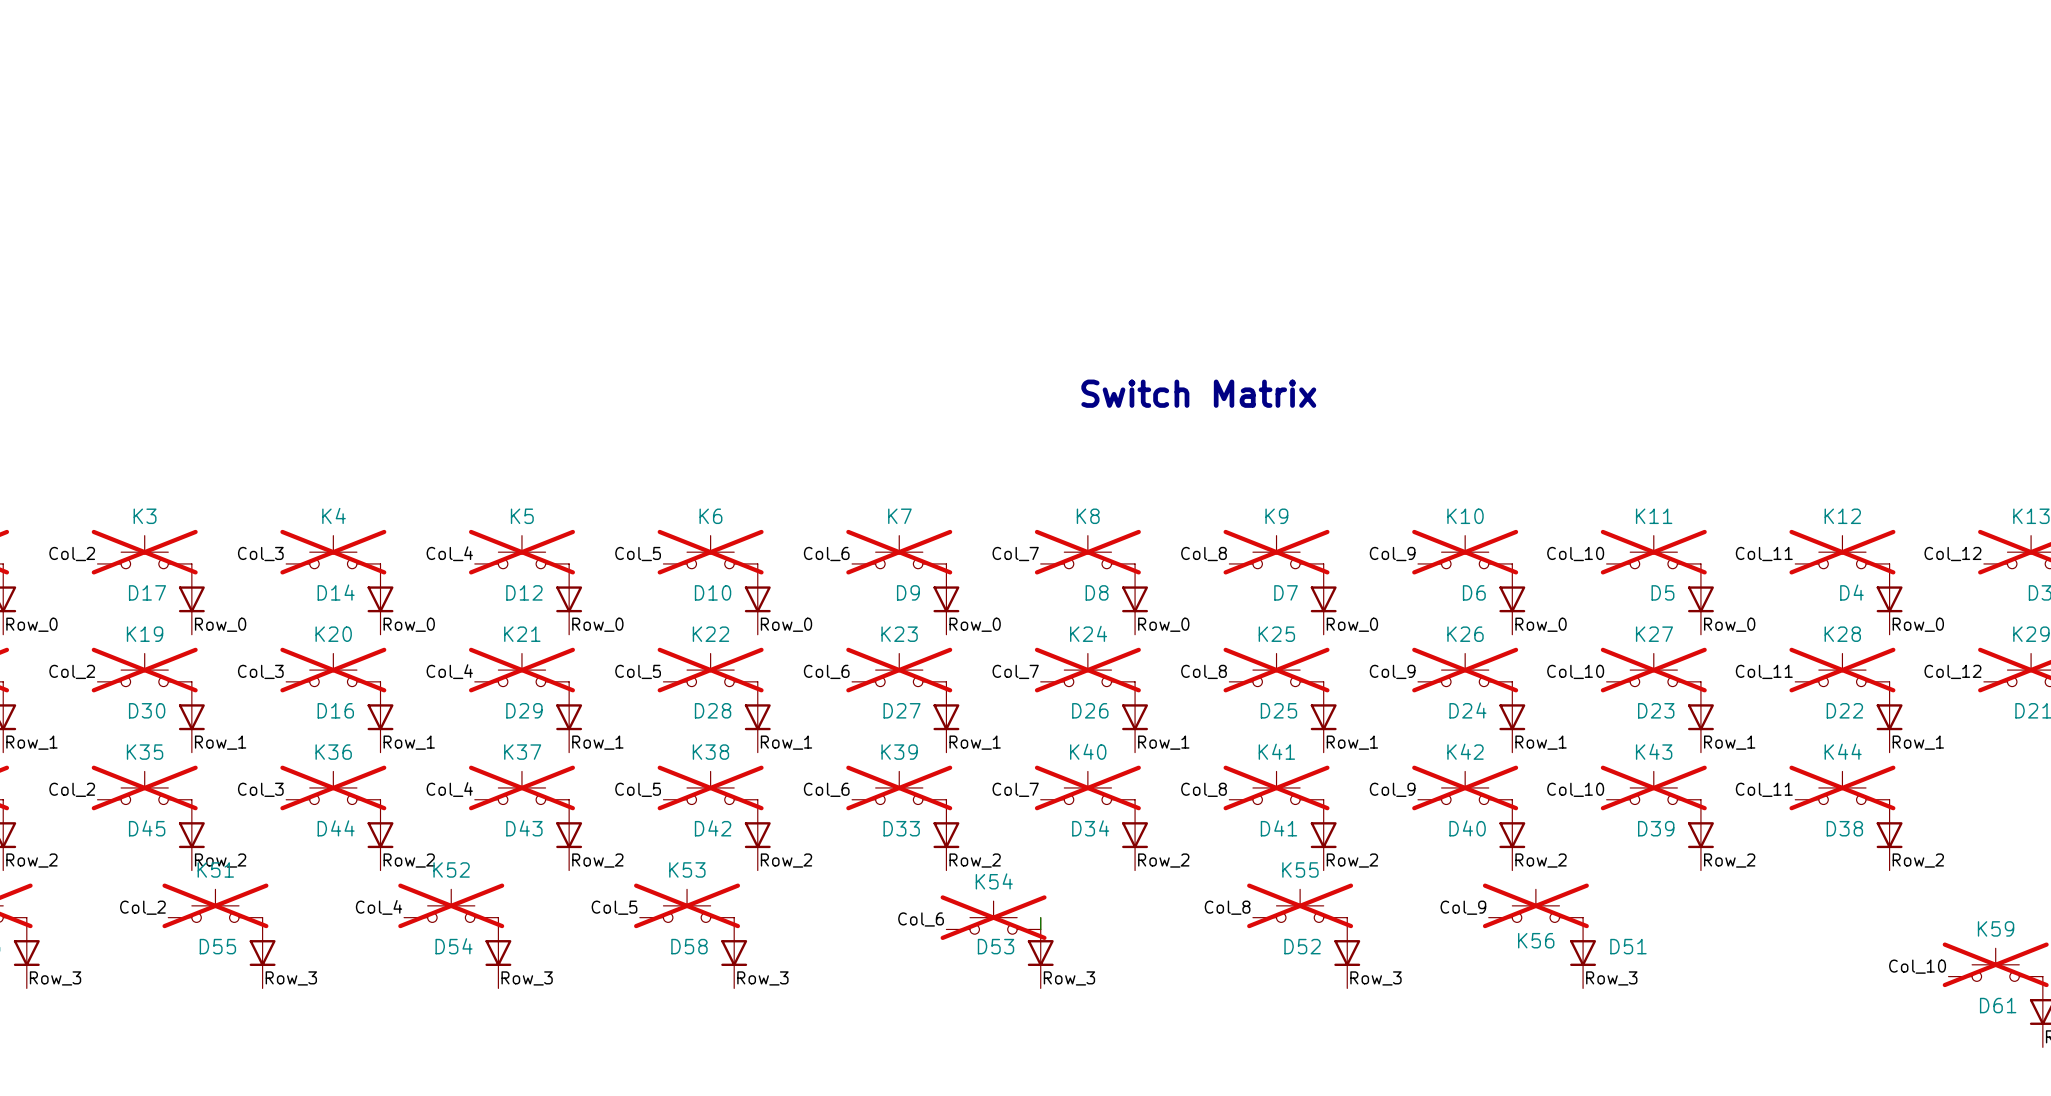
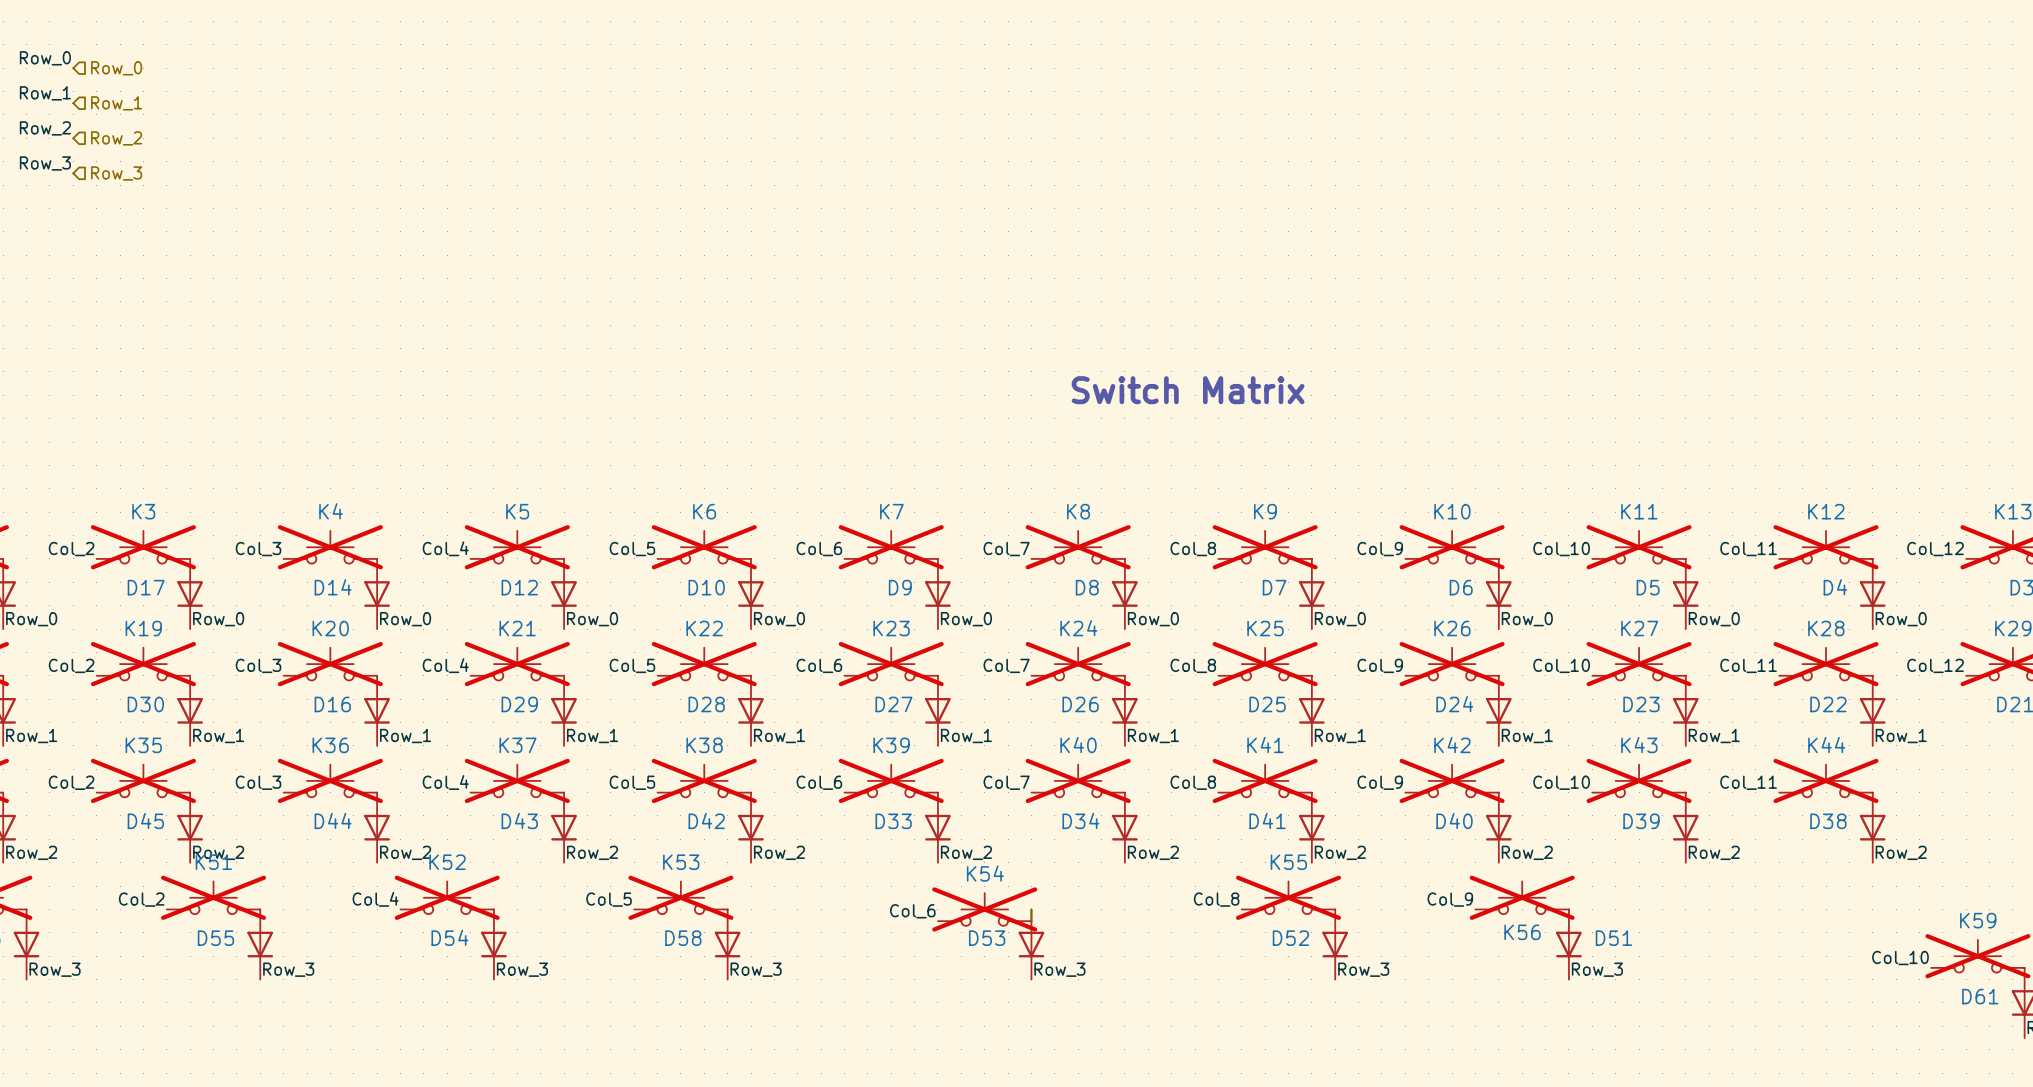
label: none -> Row_0 (45, 58)
hierarchical label: none -> Row_0 (116, 68)
label: none -> Row_1 (45, 93)
hierarchical label: none -> Row_1 (116, 103)
label: none -> Row_2 (45, 128)
hierarchical label: none -> Row_2 (116, 138)
label: none -> Row_3 (45, 163)
hierarchical label: none -> Row_3 (116, 173)

